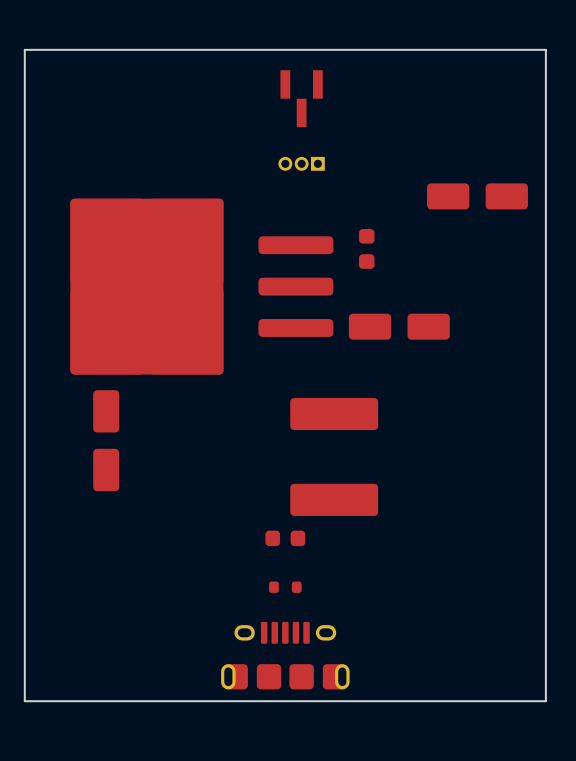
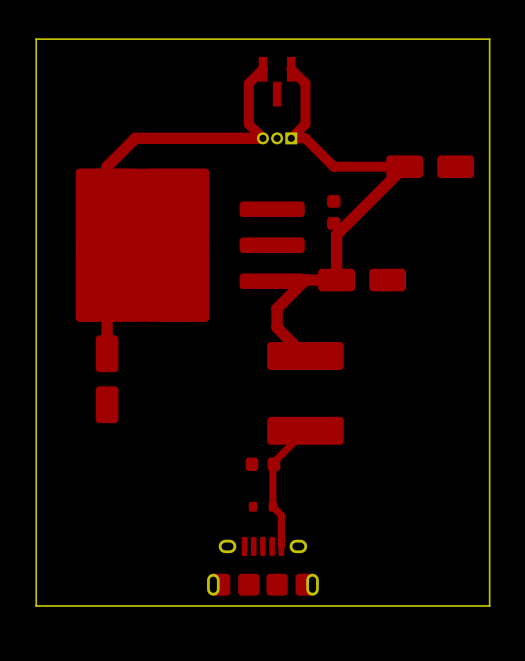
top track: none -> (262, 69) (248, 83) (248, 124) (262, 138)
top track: none -> (291, 69) (305, 83) (305, 124) (291, 138) (305, 138) (333, 166) (404, 166) (336, 234) (336, 280) (305, 280) (277, 308) (277, 327) (305, 356)
top track: none -> (262, 138) (135, 138) (107, 166) (107, 353)
top track: none -> (305, 430) (272, 463) (272, 506) (281, 515) (281, 546)

